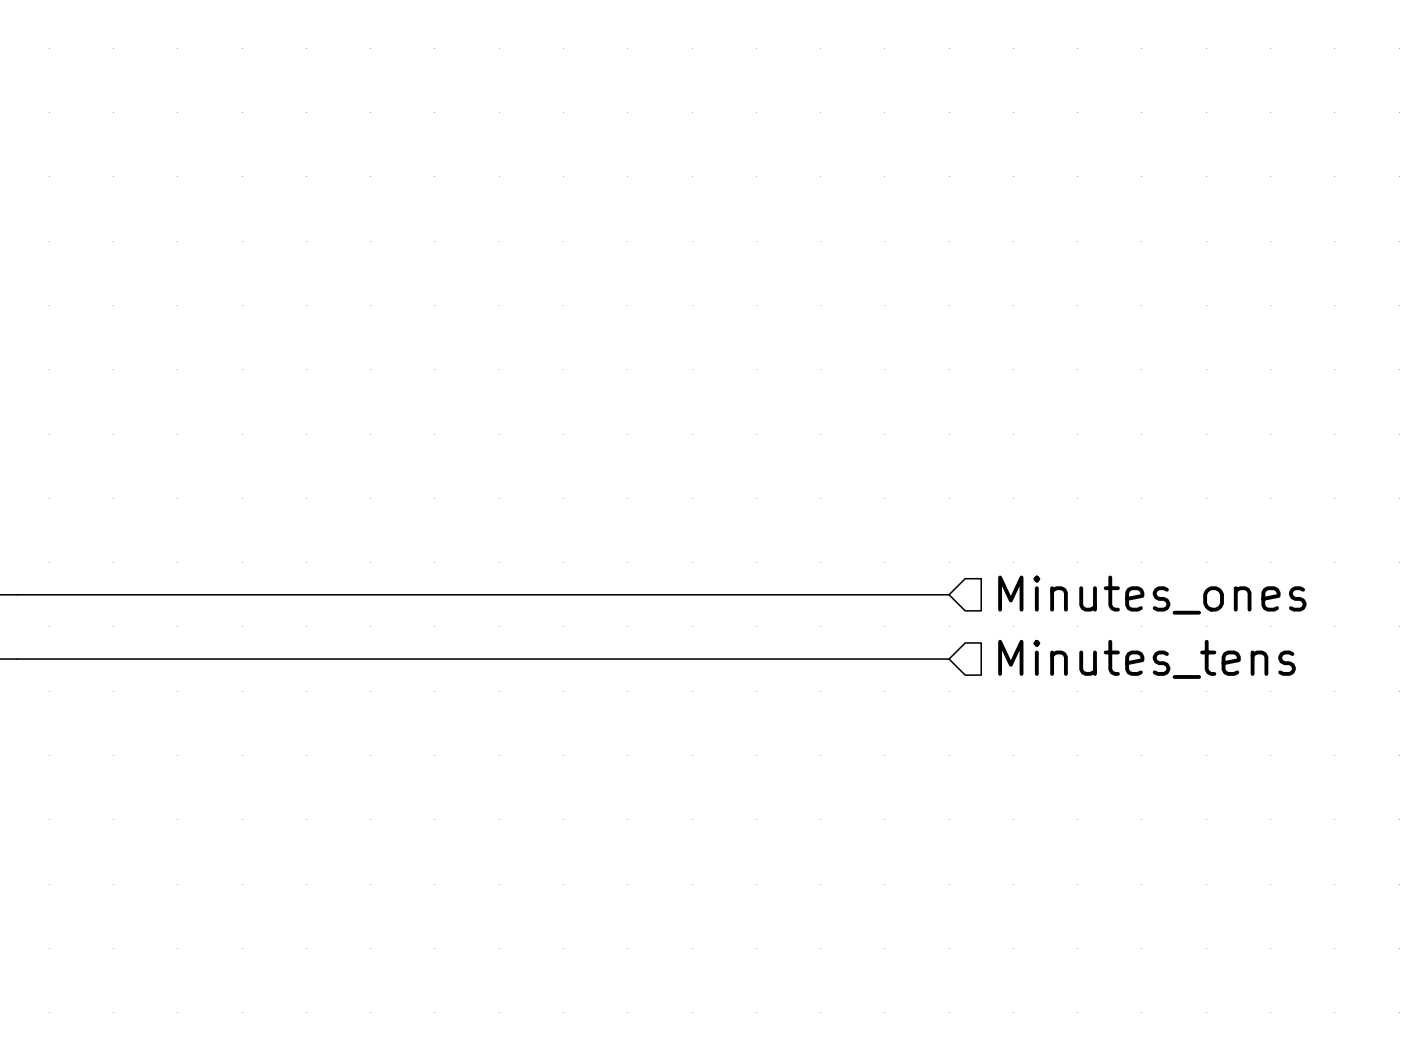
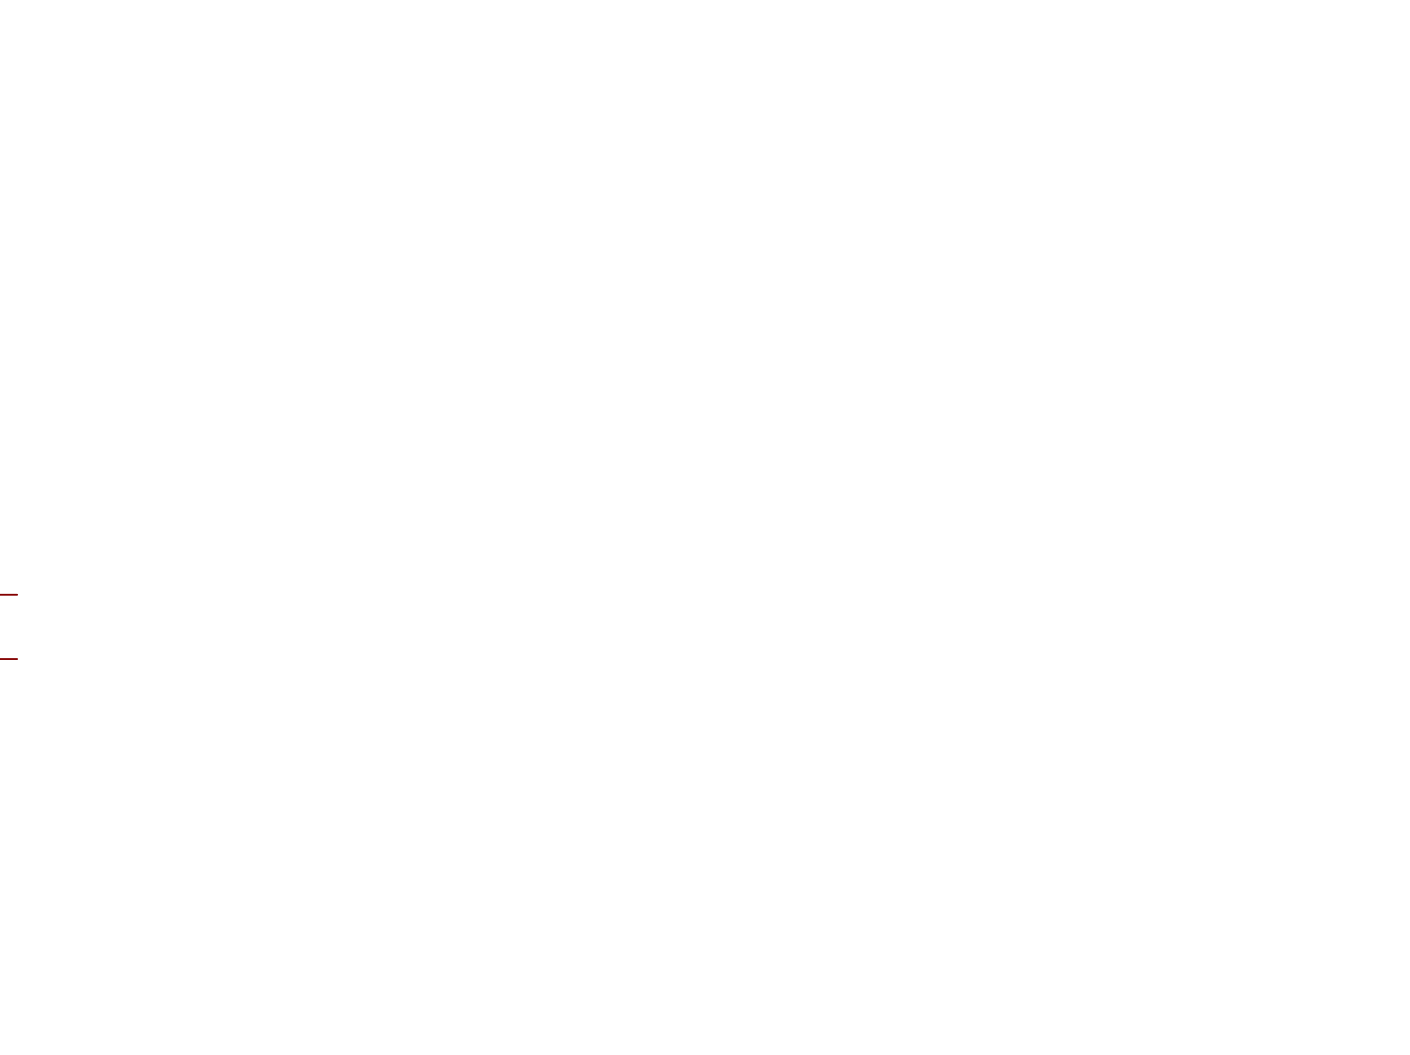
wire: (17, 594) (949, 594) -> none
hierarchical label: Minutes_ones (1152, 595) -> none
wire: (17, 659) (949, 659) -> none
hierarchical label: Minutes_tens (1147, 659) -> none

